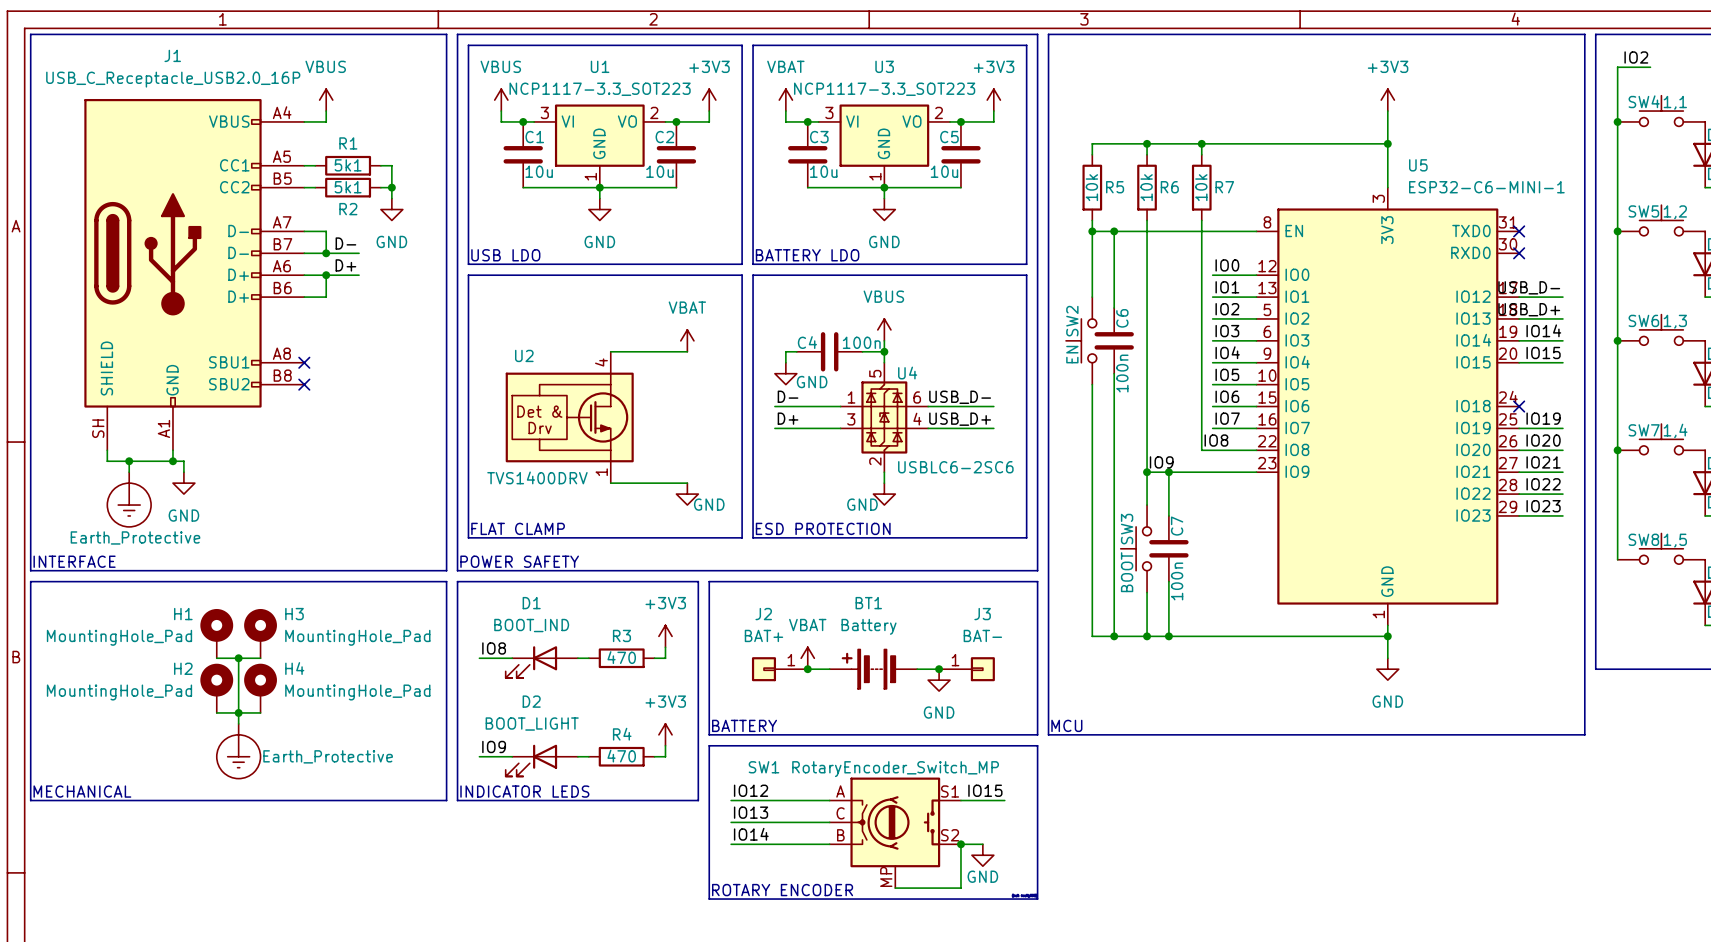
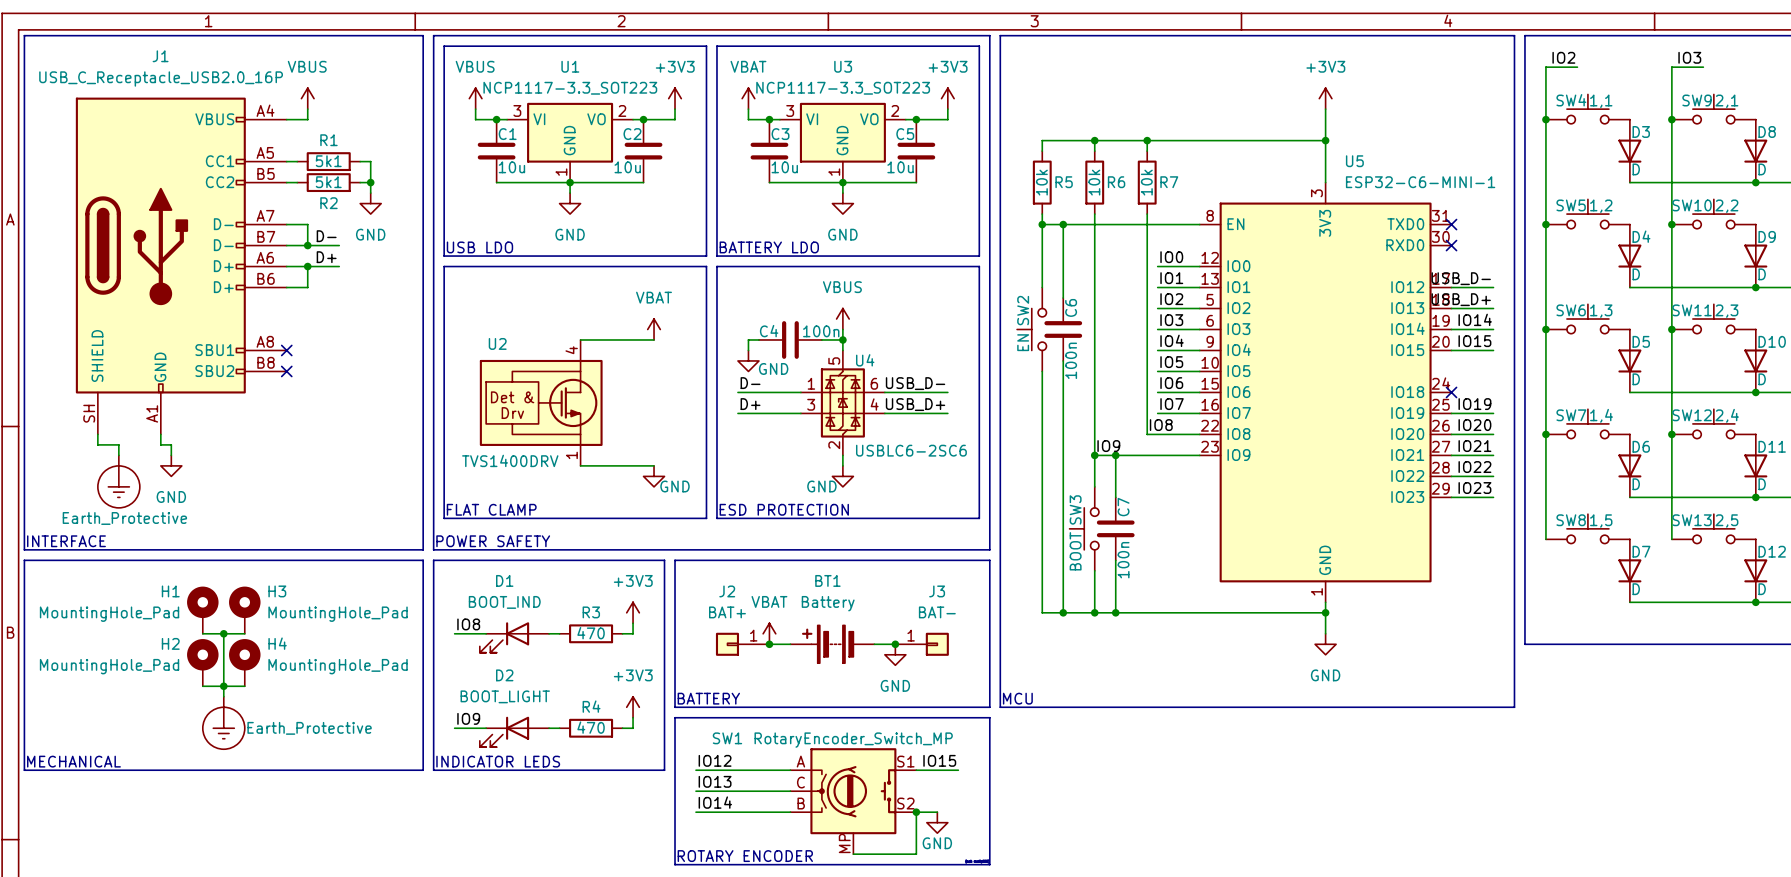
wire: (129, 461) (172, 461) -> none
junction: (129, 461) -> none
junction: (172, 461) -> none

